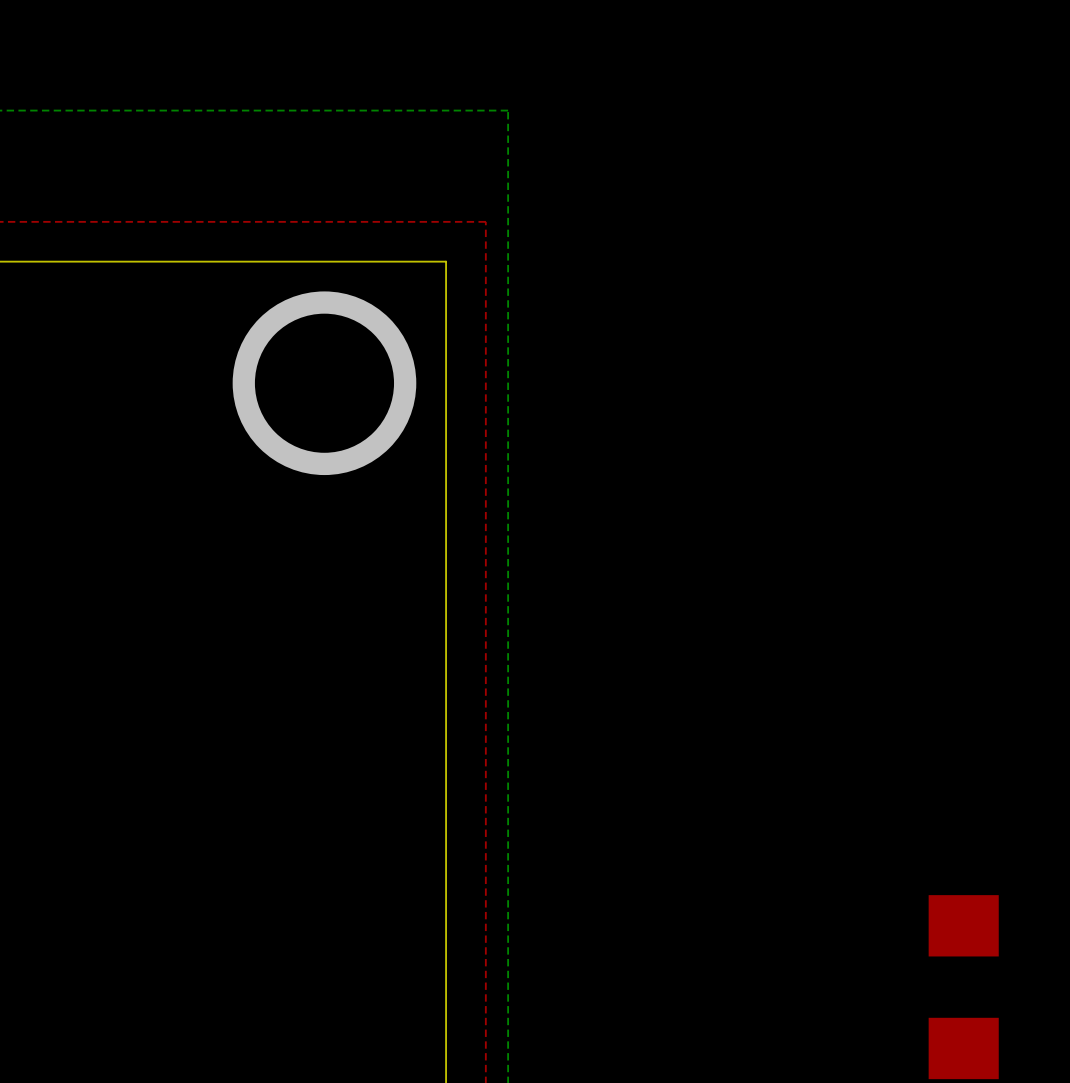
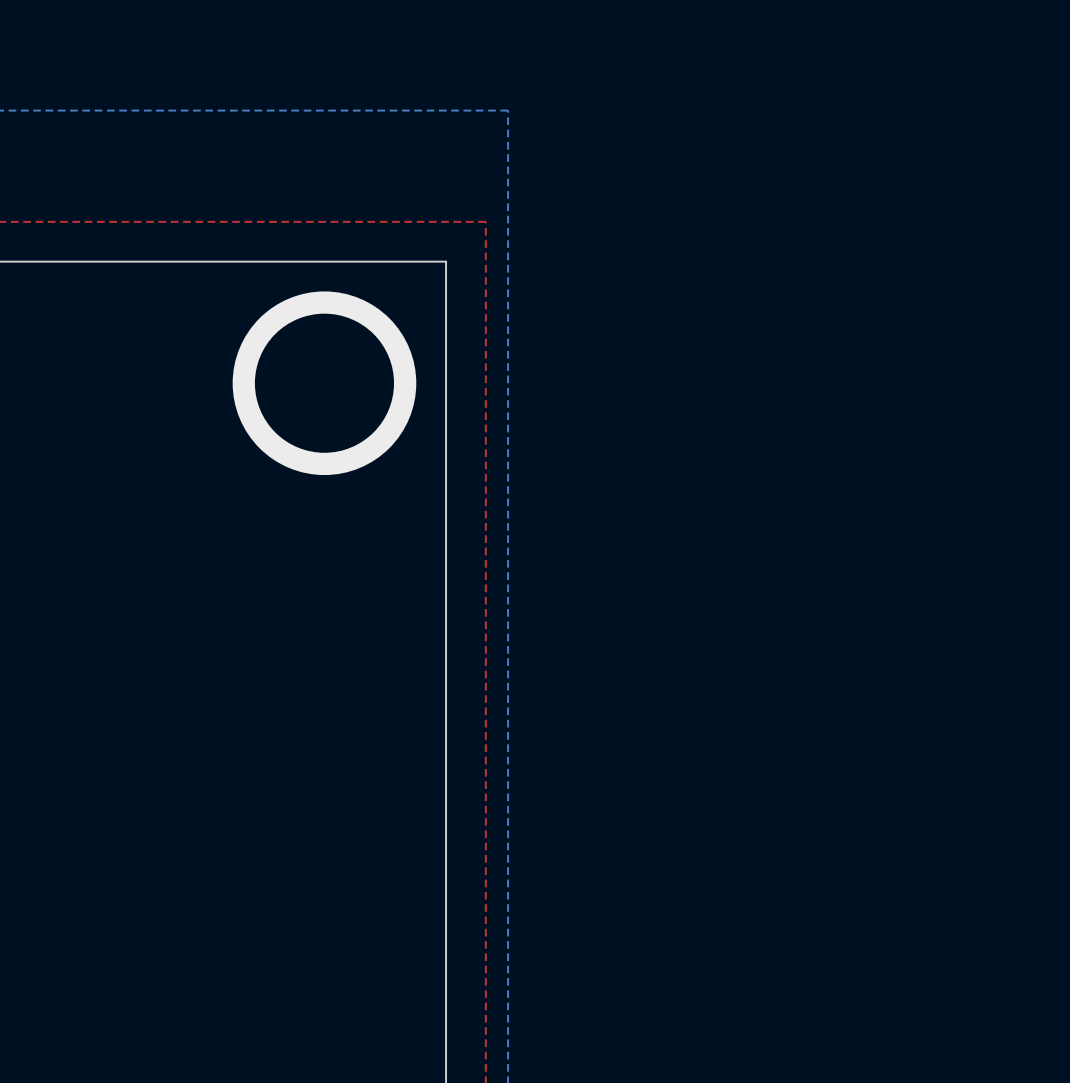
part: (963, 987) -> none

